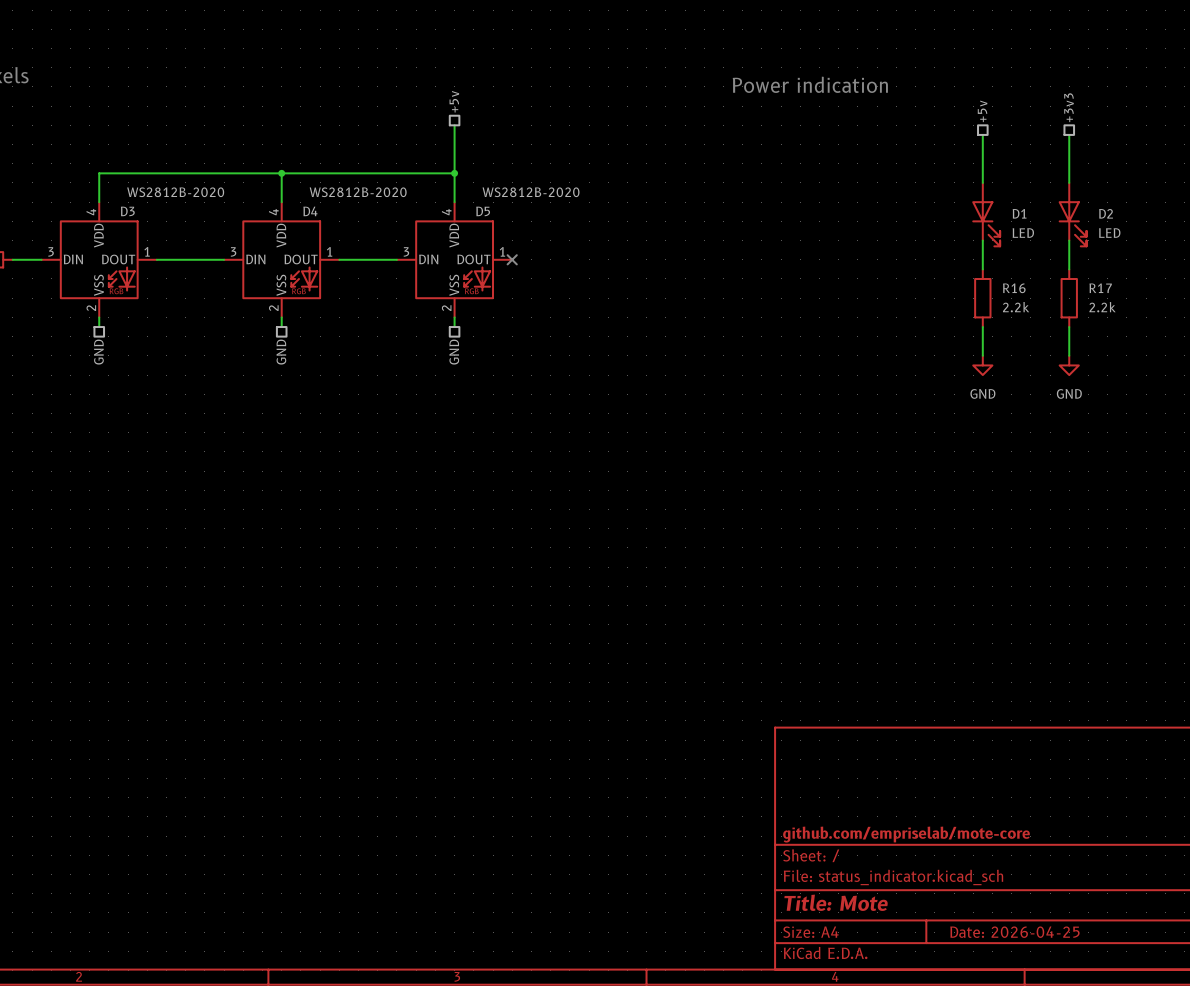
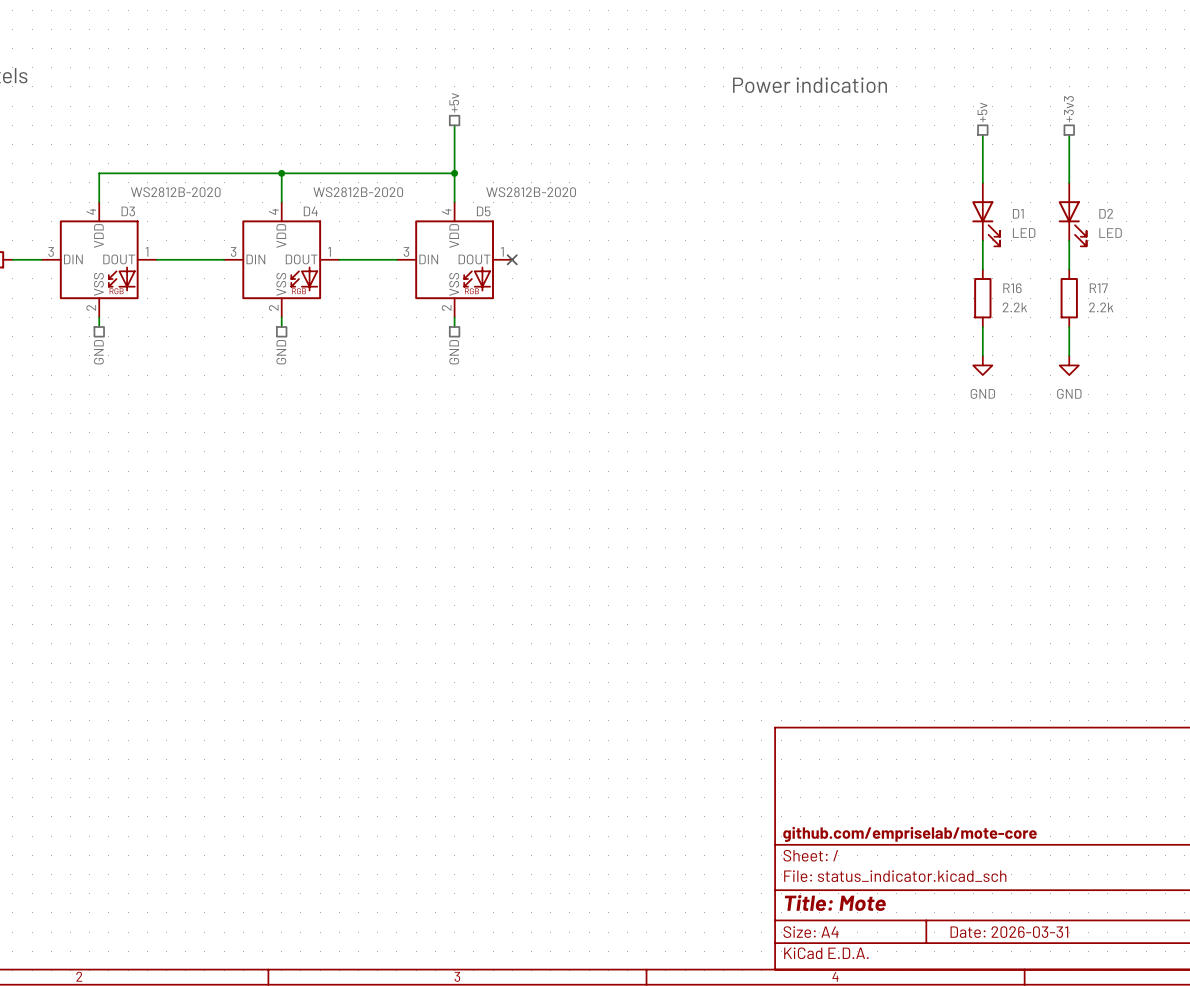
title block: Date: 2026-04-25 (1014, 932) -> Date: 2026-03-31 (1009, 932)

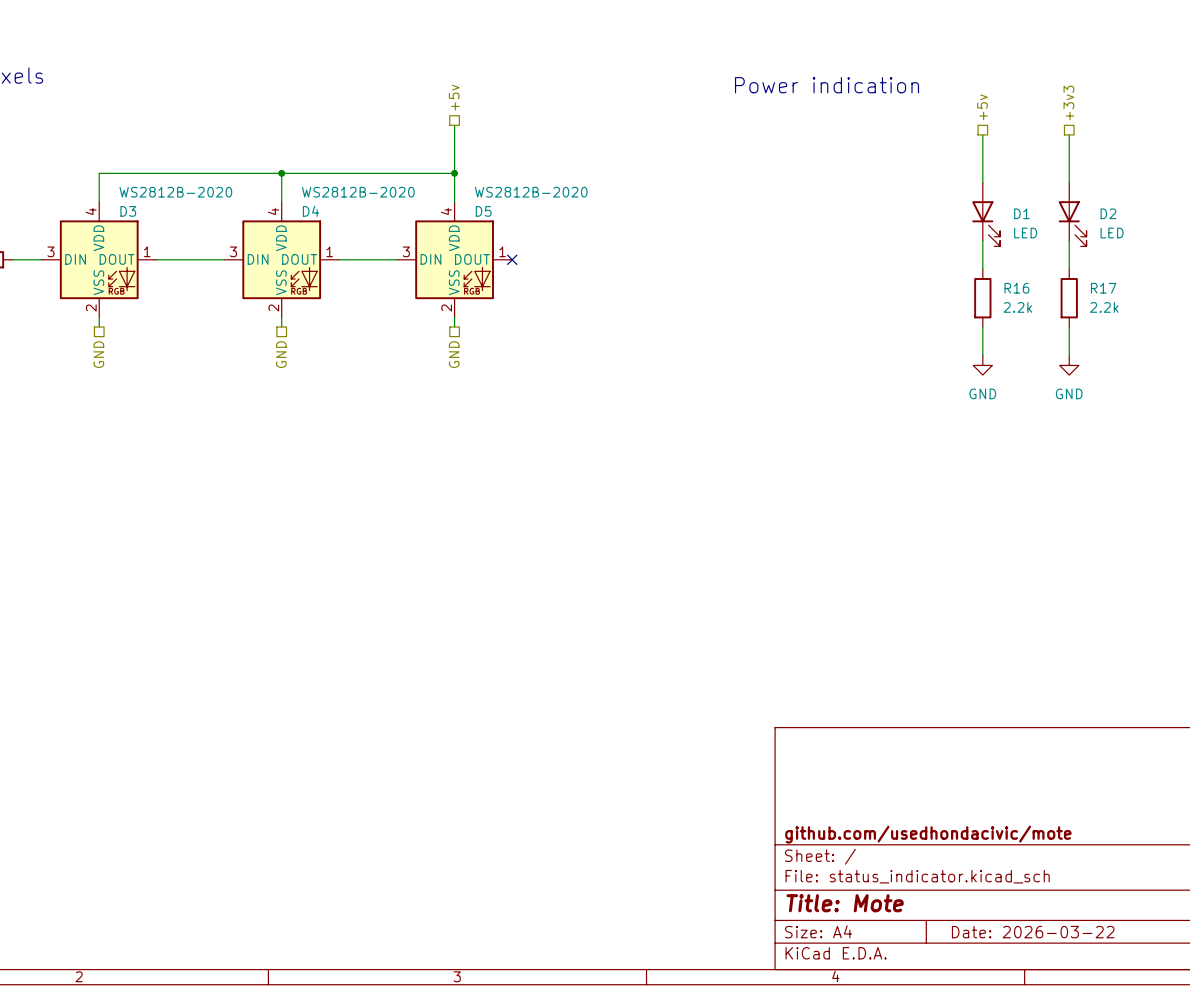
title block: github.com/empriselab/mote-core (910, 834) -> github.com/usedhondacivic/mote (928, 834)
title block: Date: 2026-03-31 (1009, 932) -> Date: 2026-03-22 (1033, 932)

